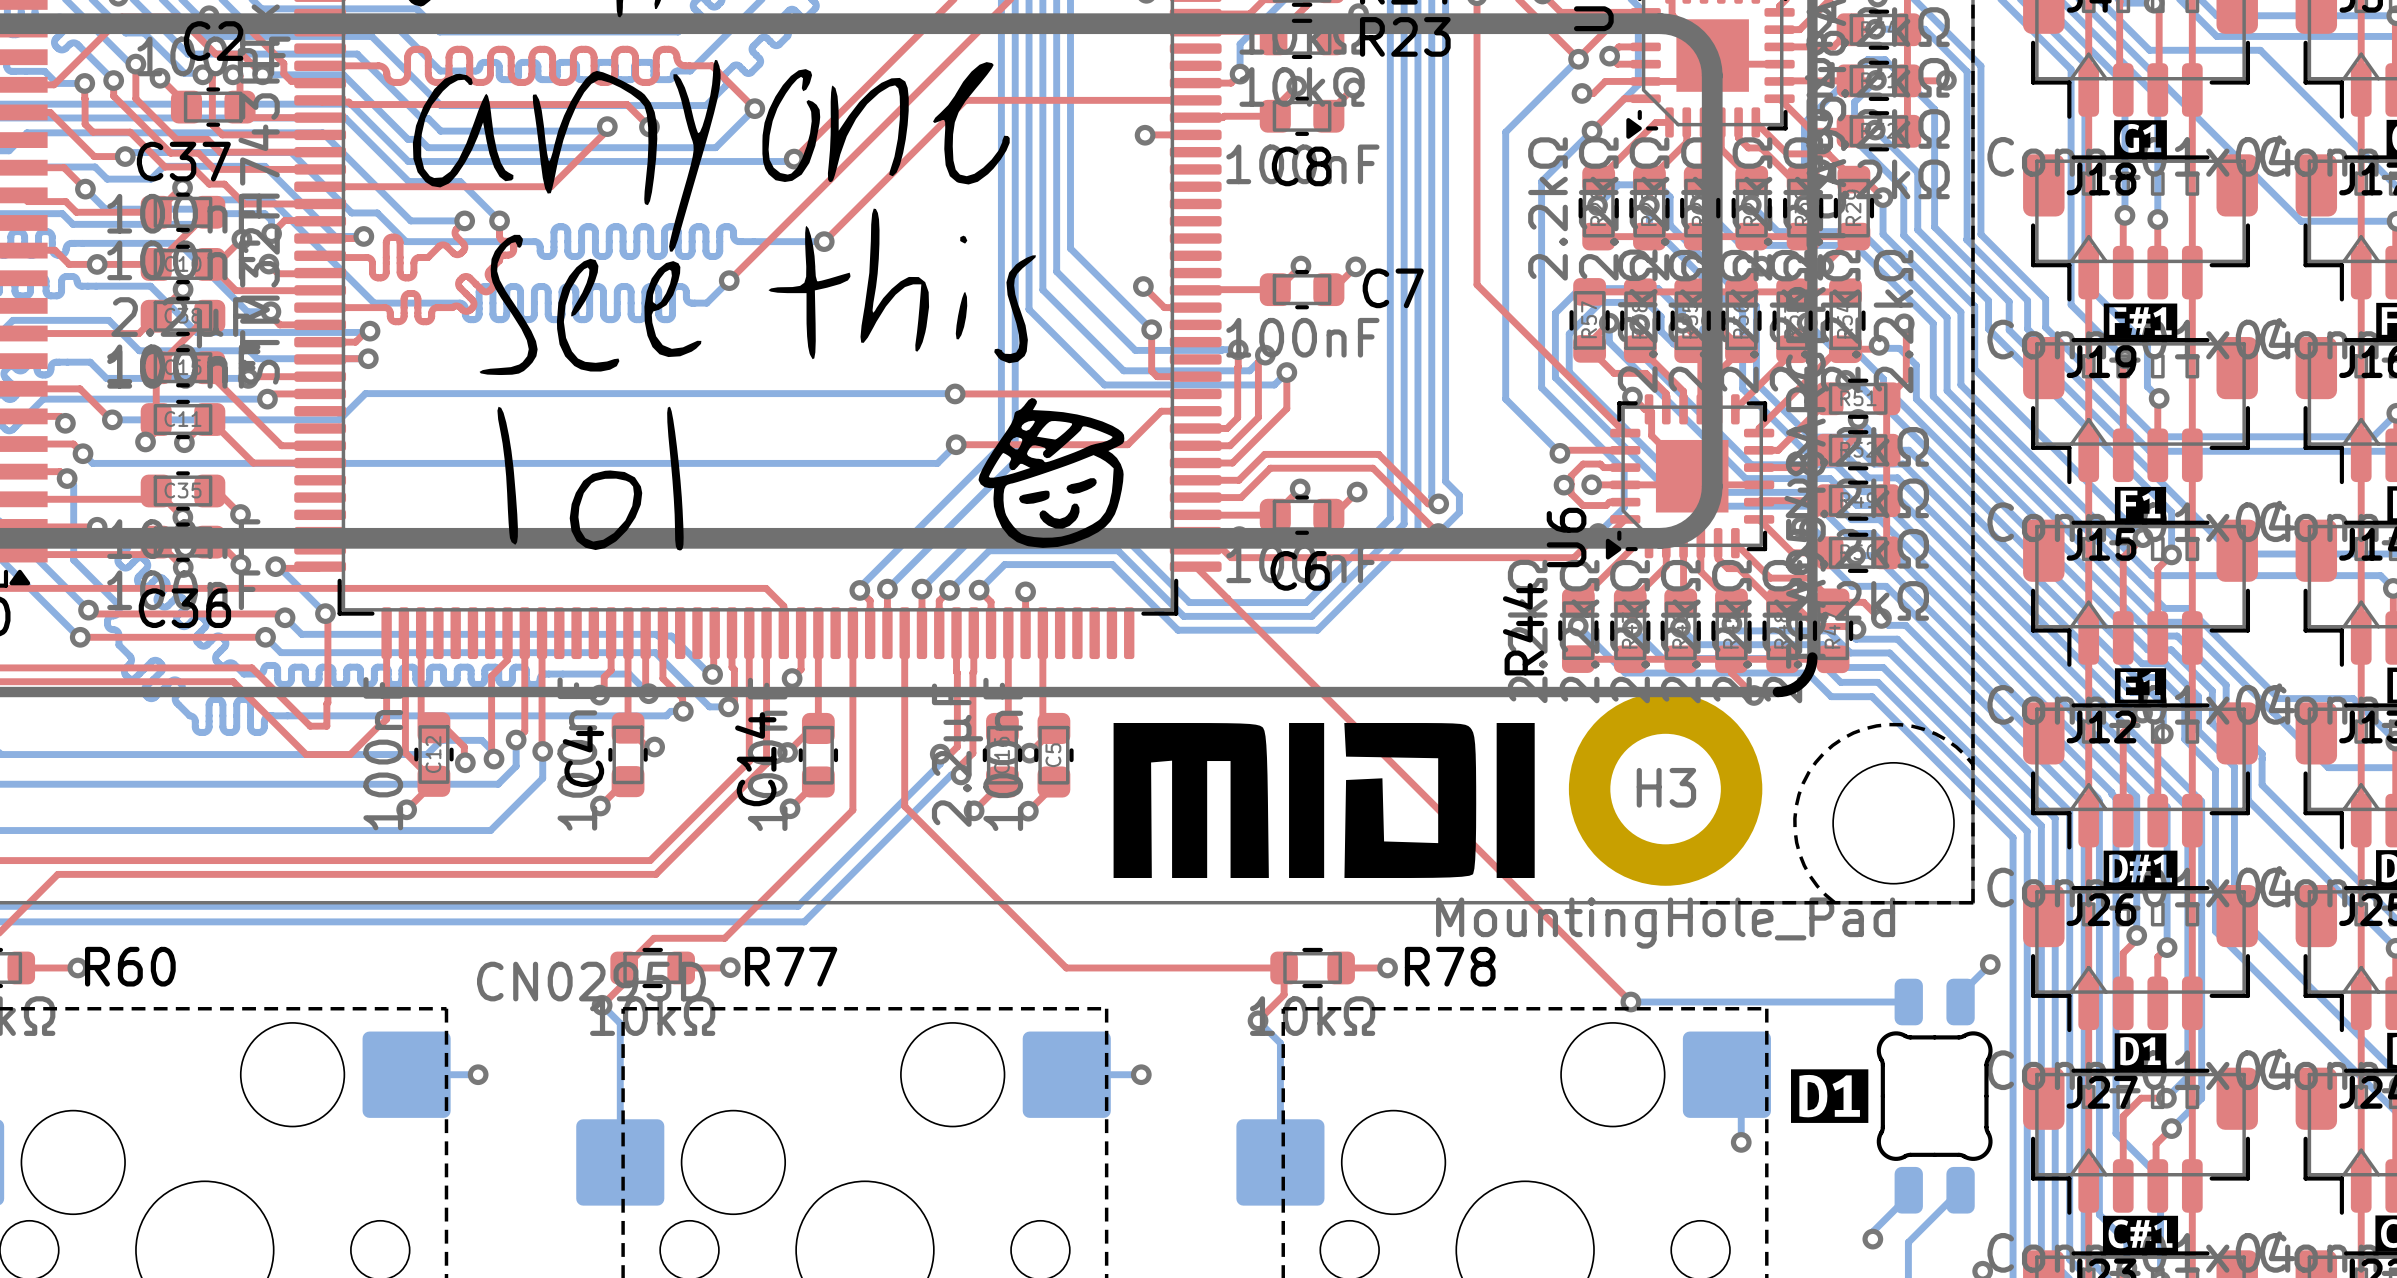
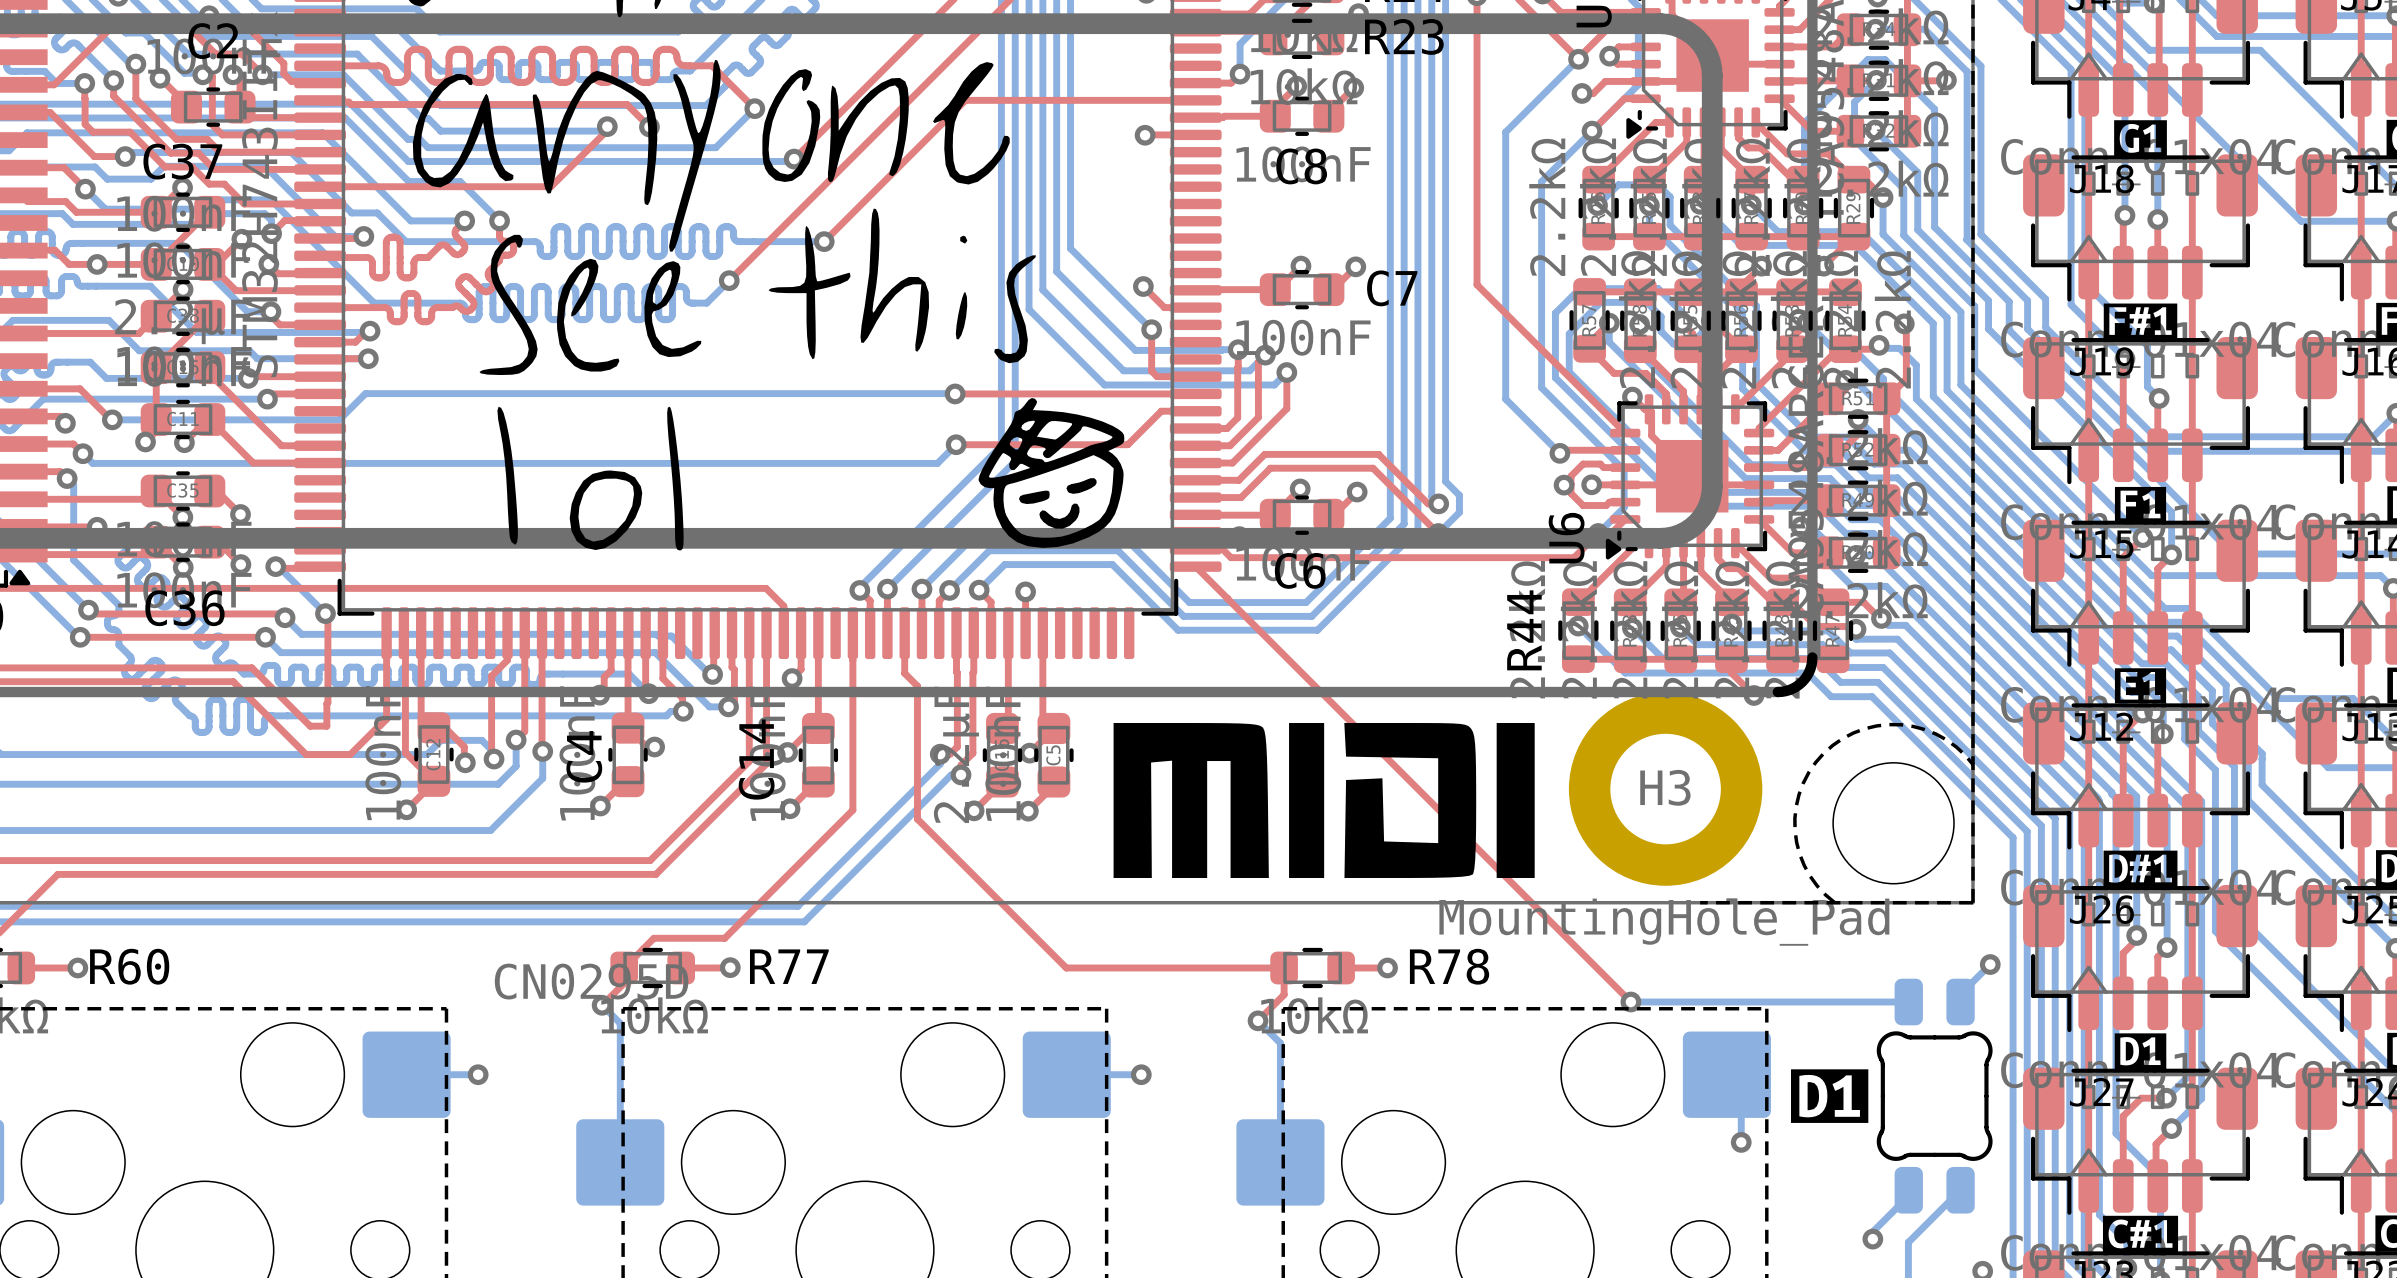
top track: (904, 673) (904, 806) (917, 819) -> (904, 673) (917, 686) (917, 819)

